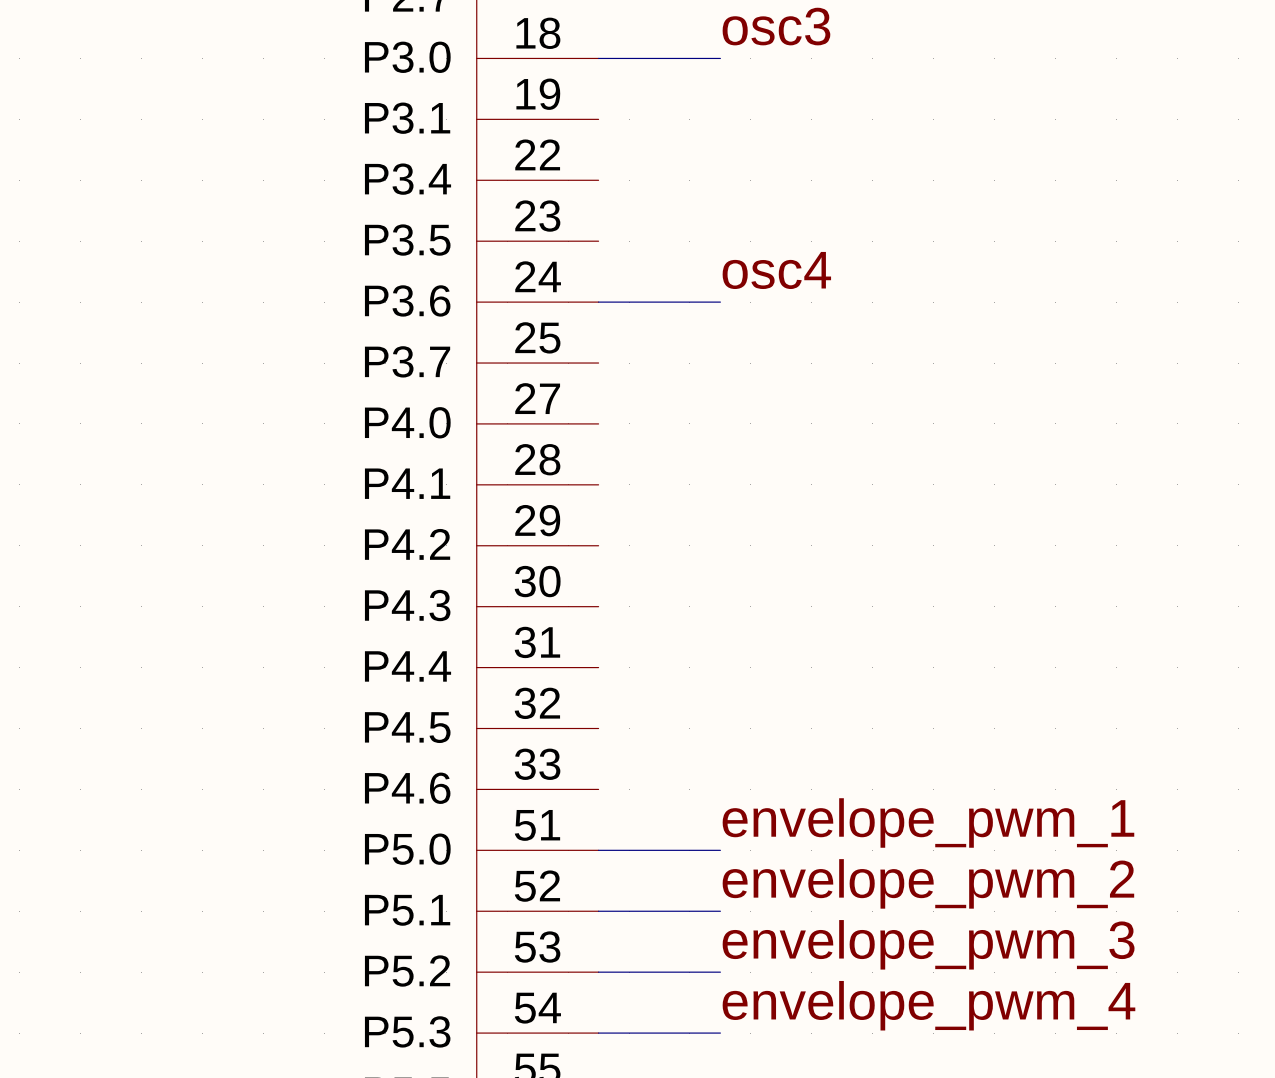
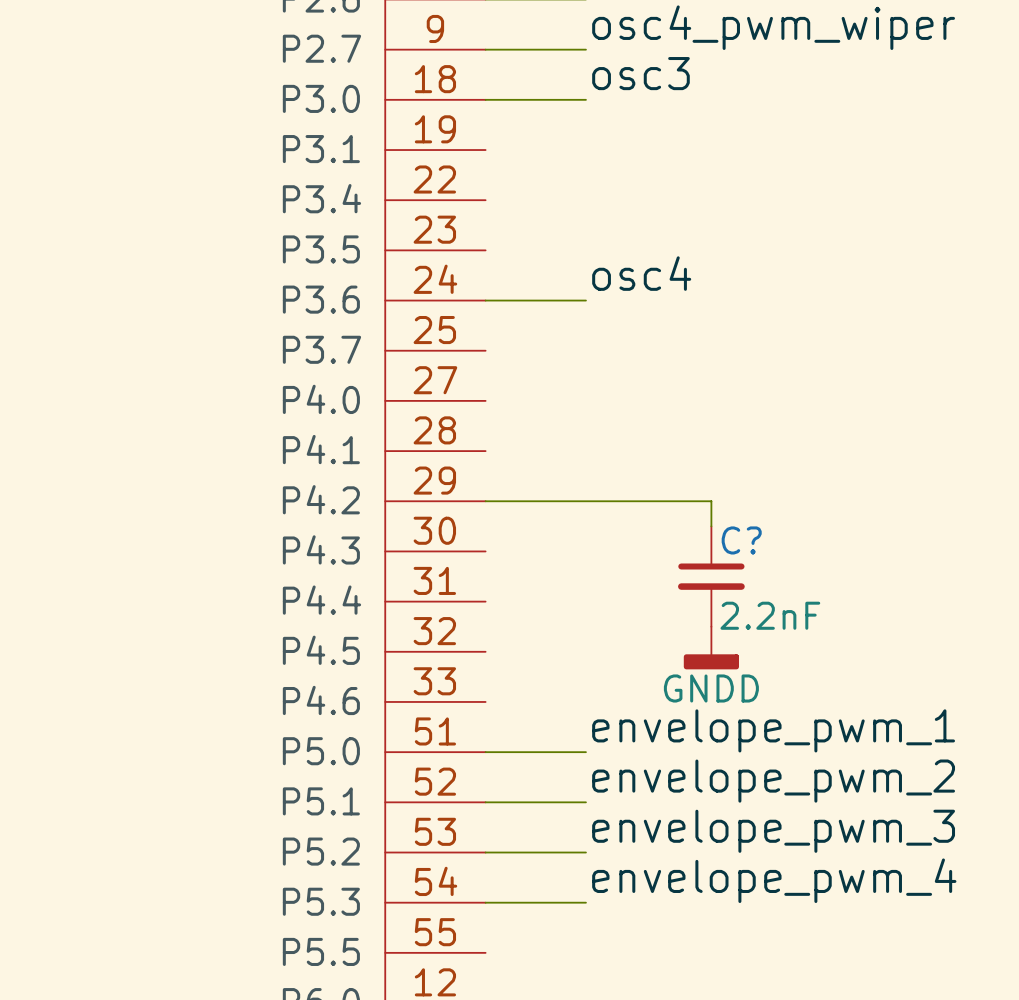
wire: none -> (485, 501) (711, 501) (711, 526)
C?: none -> 2.2nF (711, 576)
power symbol: none -> GNDD (711, 648)

